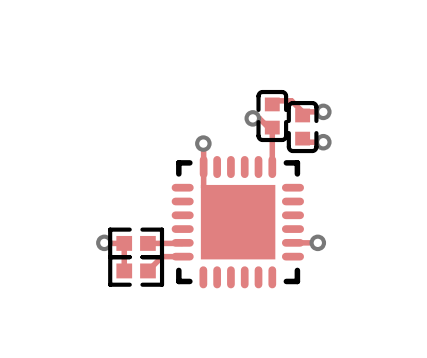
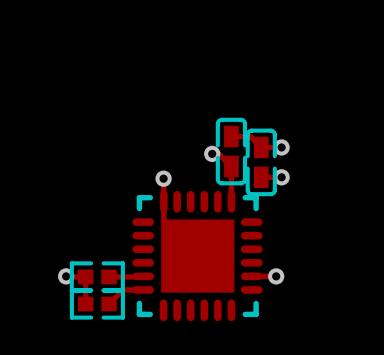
part footprint: [256, 89, 289, 143] -> [215, 117, 248, 186]
part footprint: [286, 100, 319, 154] -> [245, 128, 277, 197]

